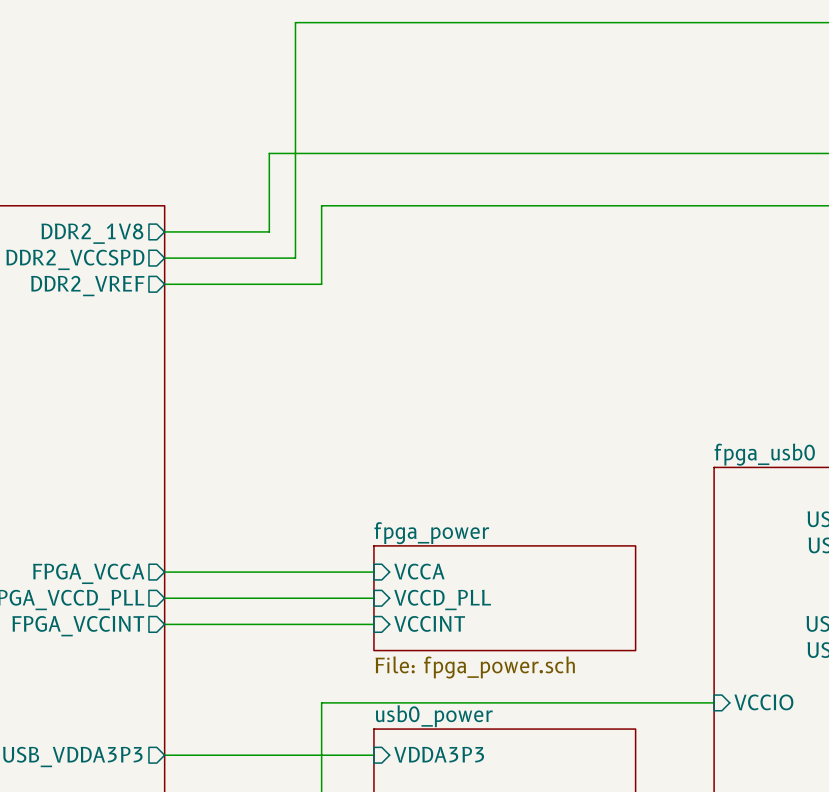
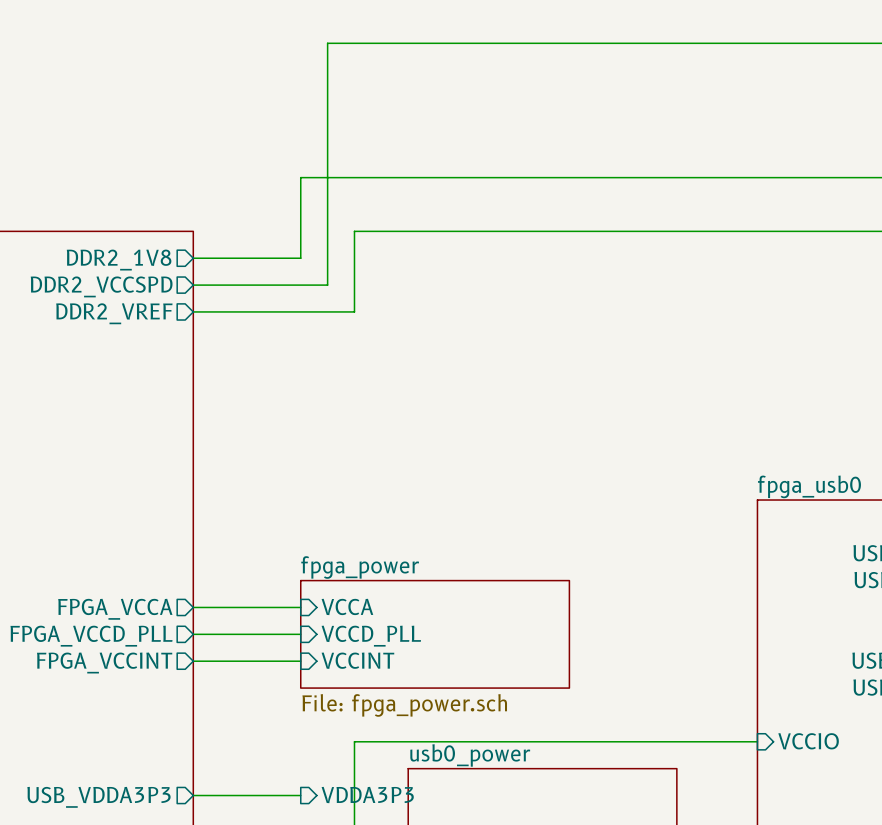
sheet pin position: VCCA (419, 571) -> VCCA (347, 606)
wire: (269, 572) (373, 572) -> none
wire: (269, 598) (373, 598) -> none
sheet fpga_power position: (504, 598) -> (435, 634)
sheet pin position: VCCD_PLL (442, 600) -> VCCD_PLL (371, 636)
sheet pin position: VCCINT (429, 623) -> VCCINT (357, 660)
wire: (269, 624) (373, 624) -> none
sheet pin position: VDDA3P3 (439, 754) -> VDDA3P3 (367, 795)
wire: (269, 755) (373, 755) -> none

